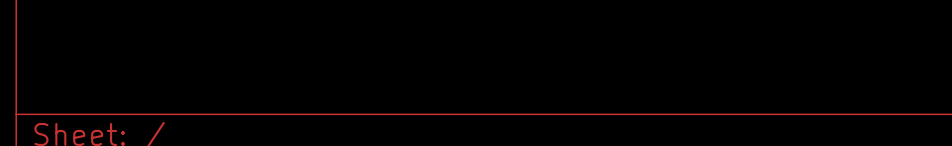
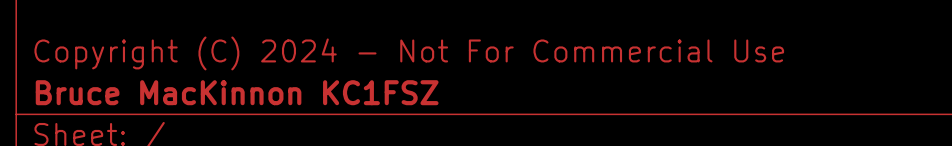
title block: none -> Copyright (C) 2024 - Not For Commercial Use (409, 53)
title block: none -> Bruce MacKinnon KC1FSZ (237, 92)

